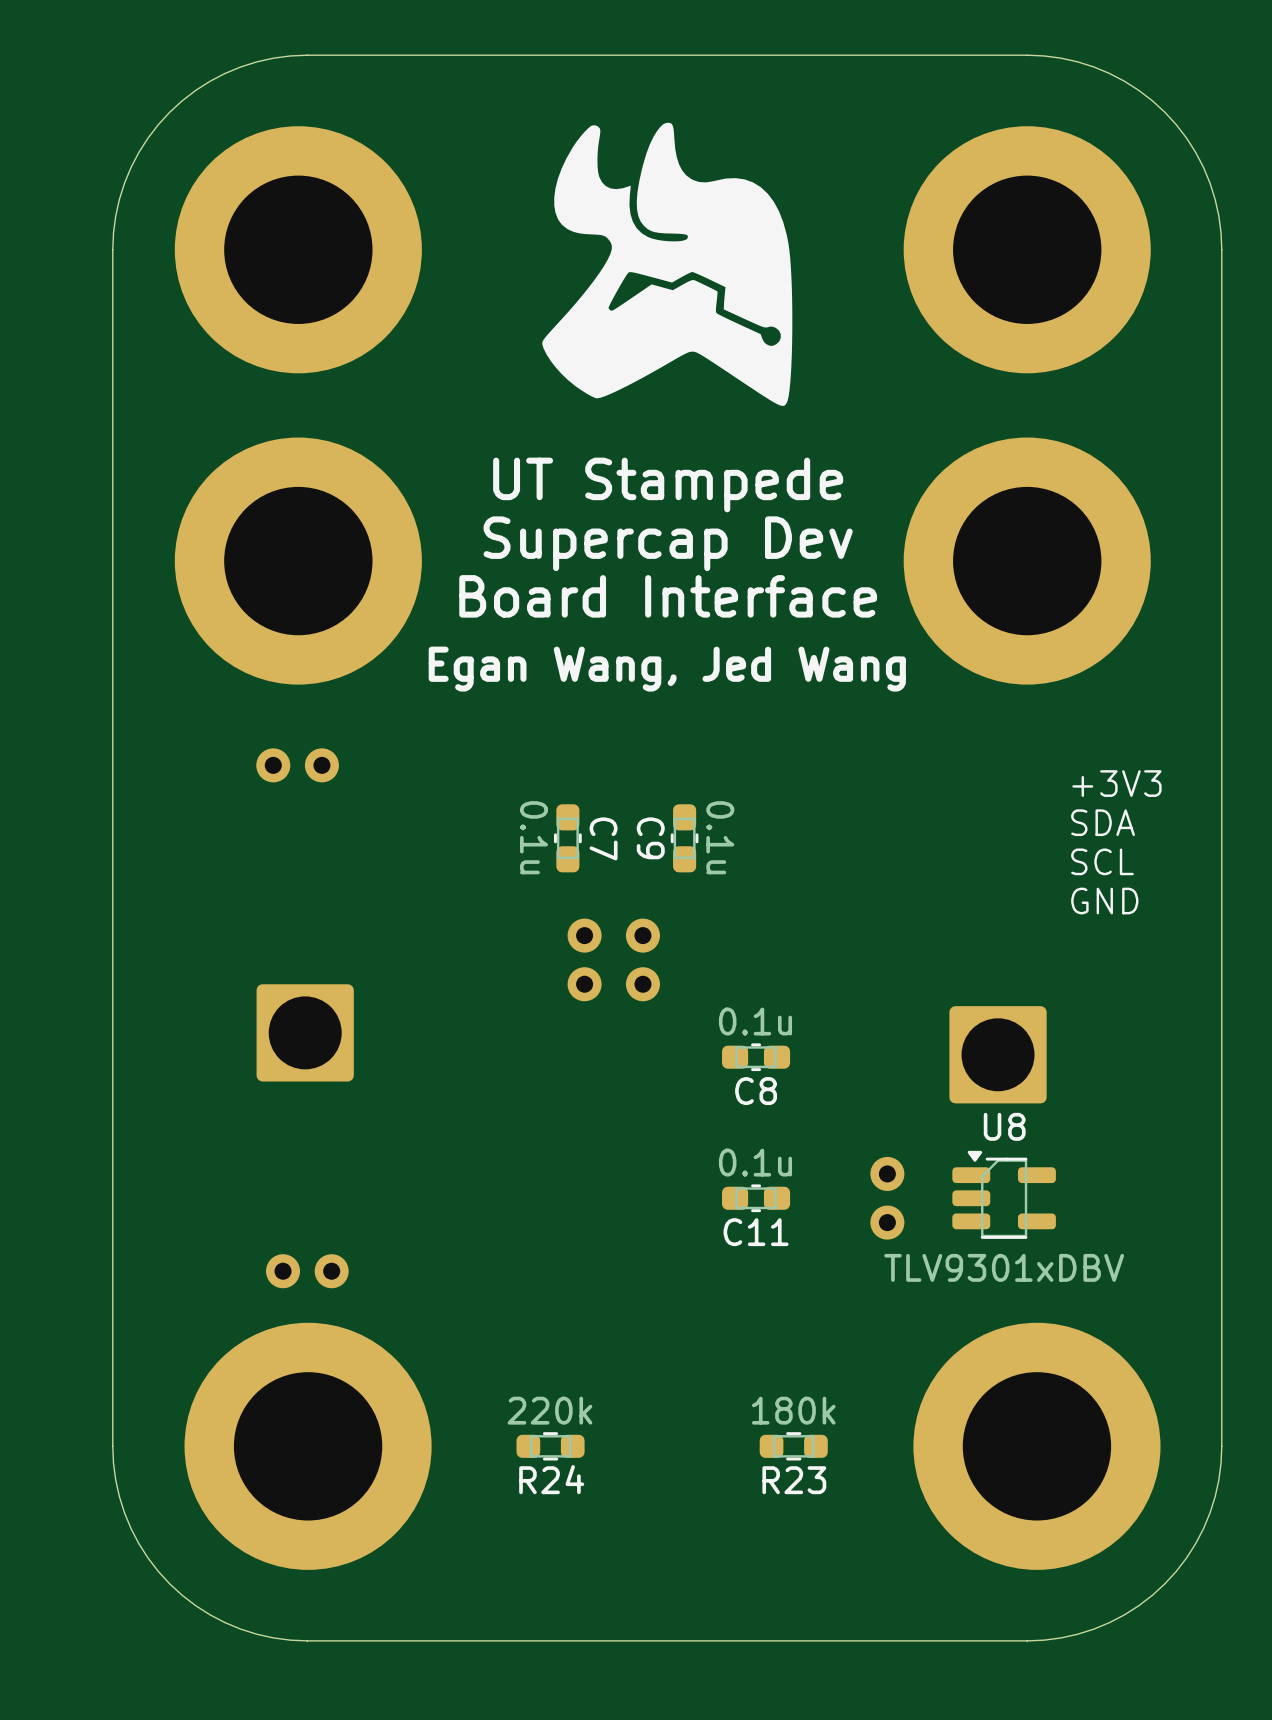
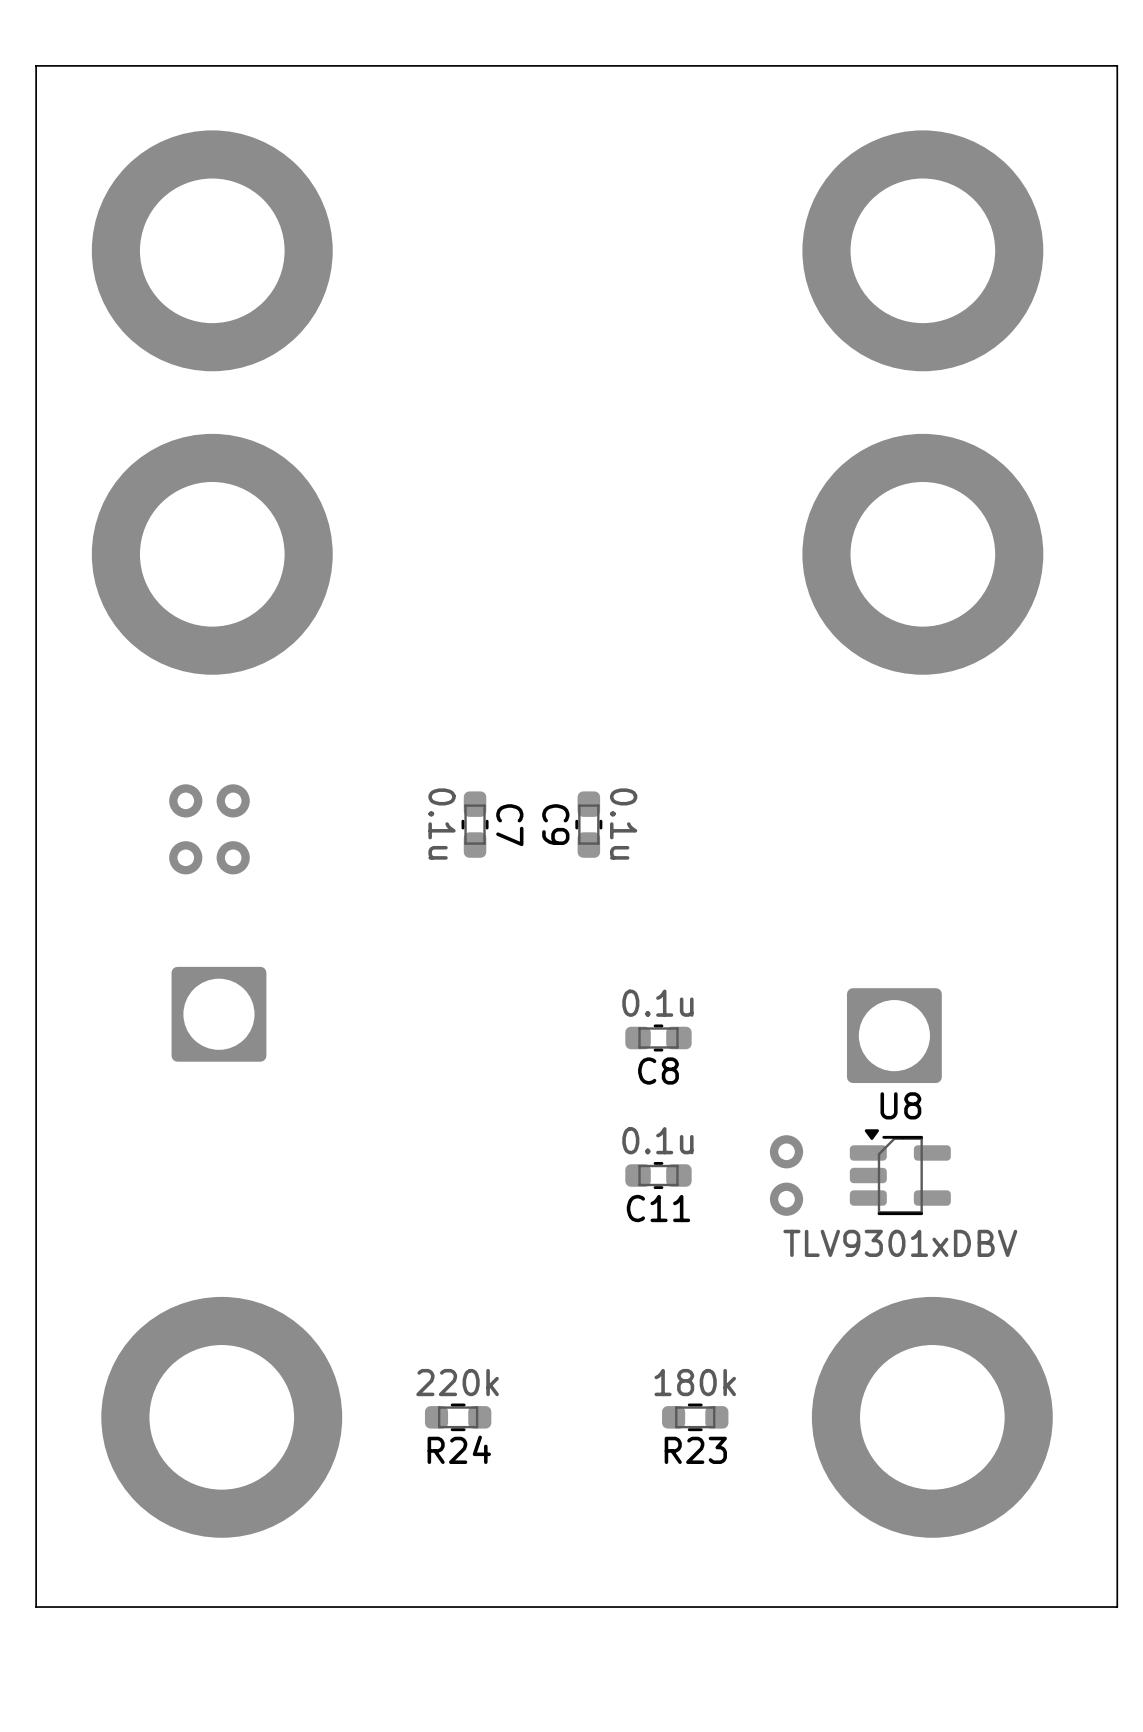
drawing: [542, 122, 793, 406] -> none
text: UT Stampede (668, 484) -> none
text: Supercap Dev (668, 543) -> none
text: Board Interface (668, 596) -> none
text: Egan Wang, Jed Wang (667, 669) -> none
part position: (297, 765) -> (209, 800)
text: +3V3 (1116, 783) -> none
text: SDA (1103, 822) -> none
text: SCL (1102, 861) -> none
part: none -> (209, 857)
text: GND (1104, 901) -> none
part: (584, 959) -> none
part: (642, 959) -> none
part: (307, 1271) -> none
board edge: (1027, 1640) (1061, 1637) (1093, 1629) (1124, 1614) (1164, 1583) (1186, 1557) (1203, 1528) (1215, 1496) (1221, 1446) (1221, 249) (1218, 215) (1210, 183) (1195, 152) (1176, 124) (1152, 100) (1124, 81) (1093, 66) (1061, 58) (1027, 55) (290, 55) (240, 66) (195, 90) (158, 124) (131, 167) (115, 215) (112, 249) (113, 1463) (119, 1496) (131, 1528) (147, 1557) (169, 1583) (195, 1605) (225, 1622) (256, 1634) (307, 1640) -> (922, 1607) (1117, 1607) (1117, 65) (36, 65) (36, 1607) (221, 1607)

